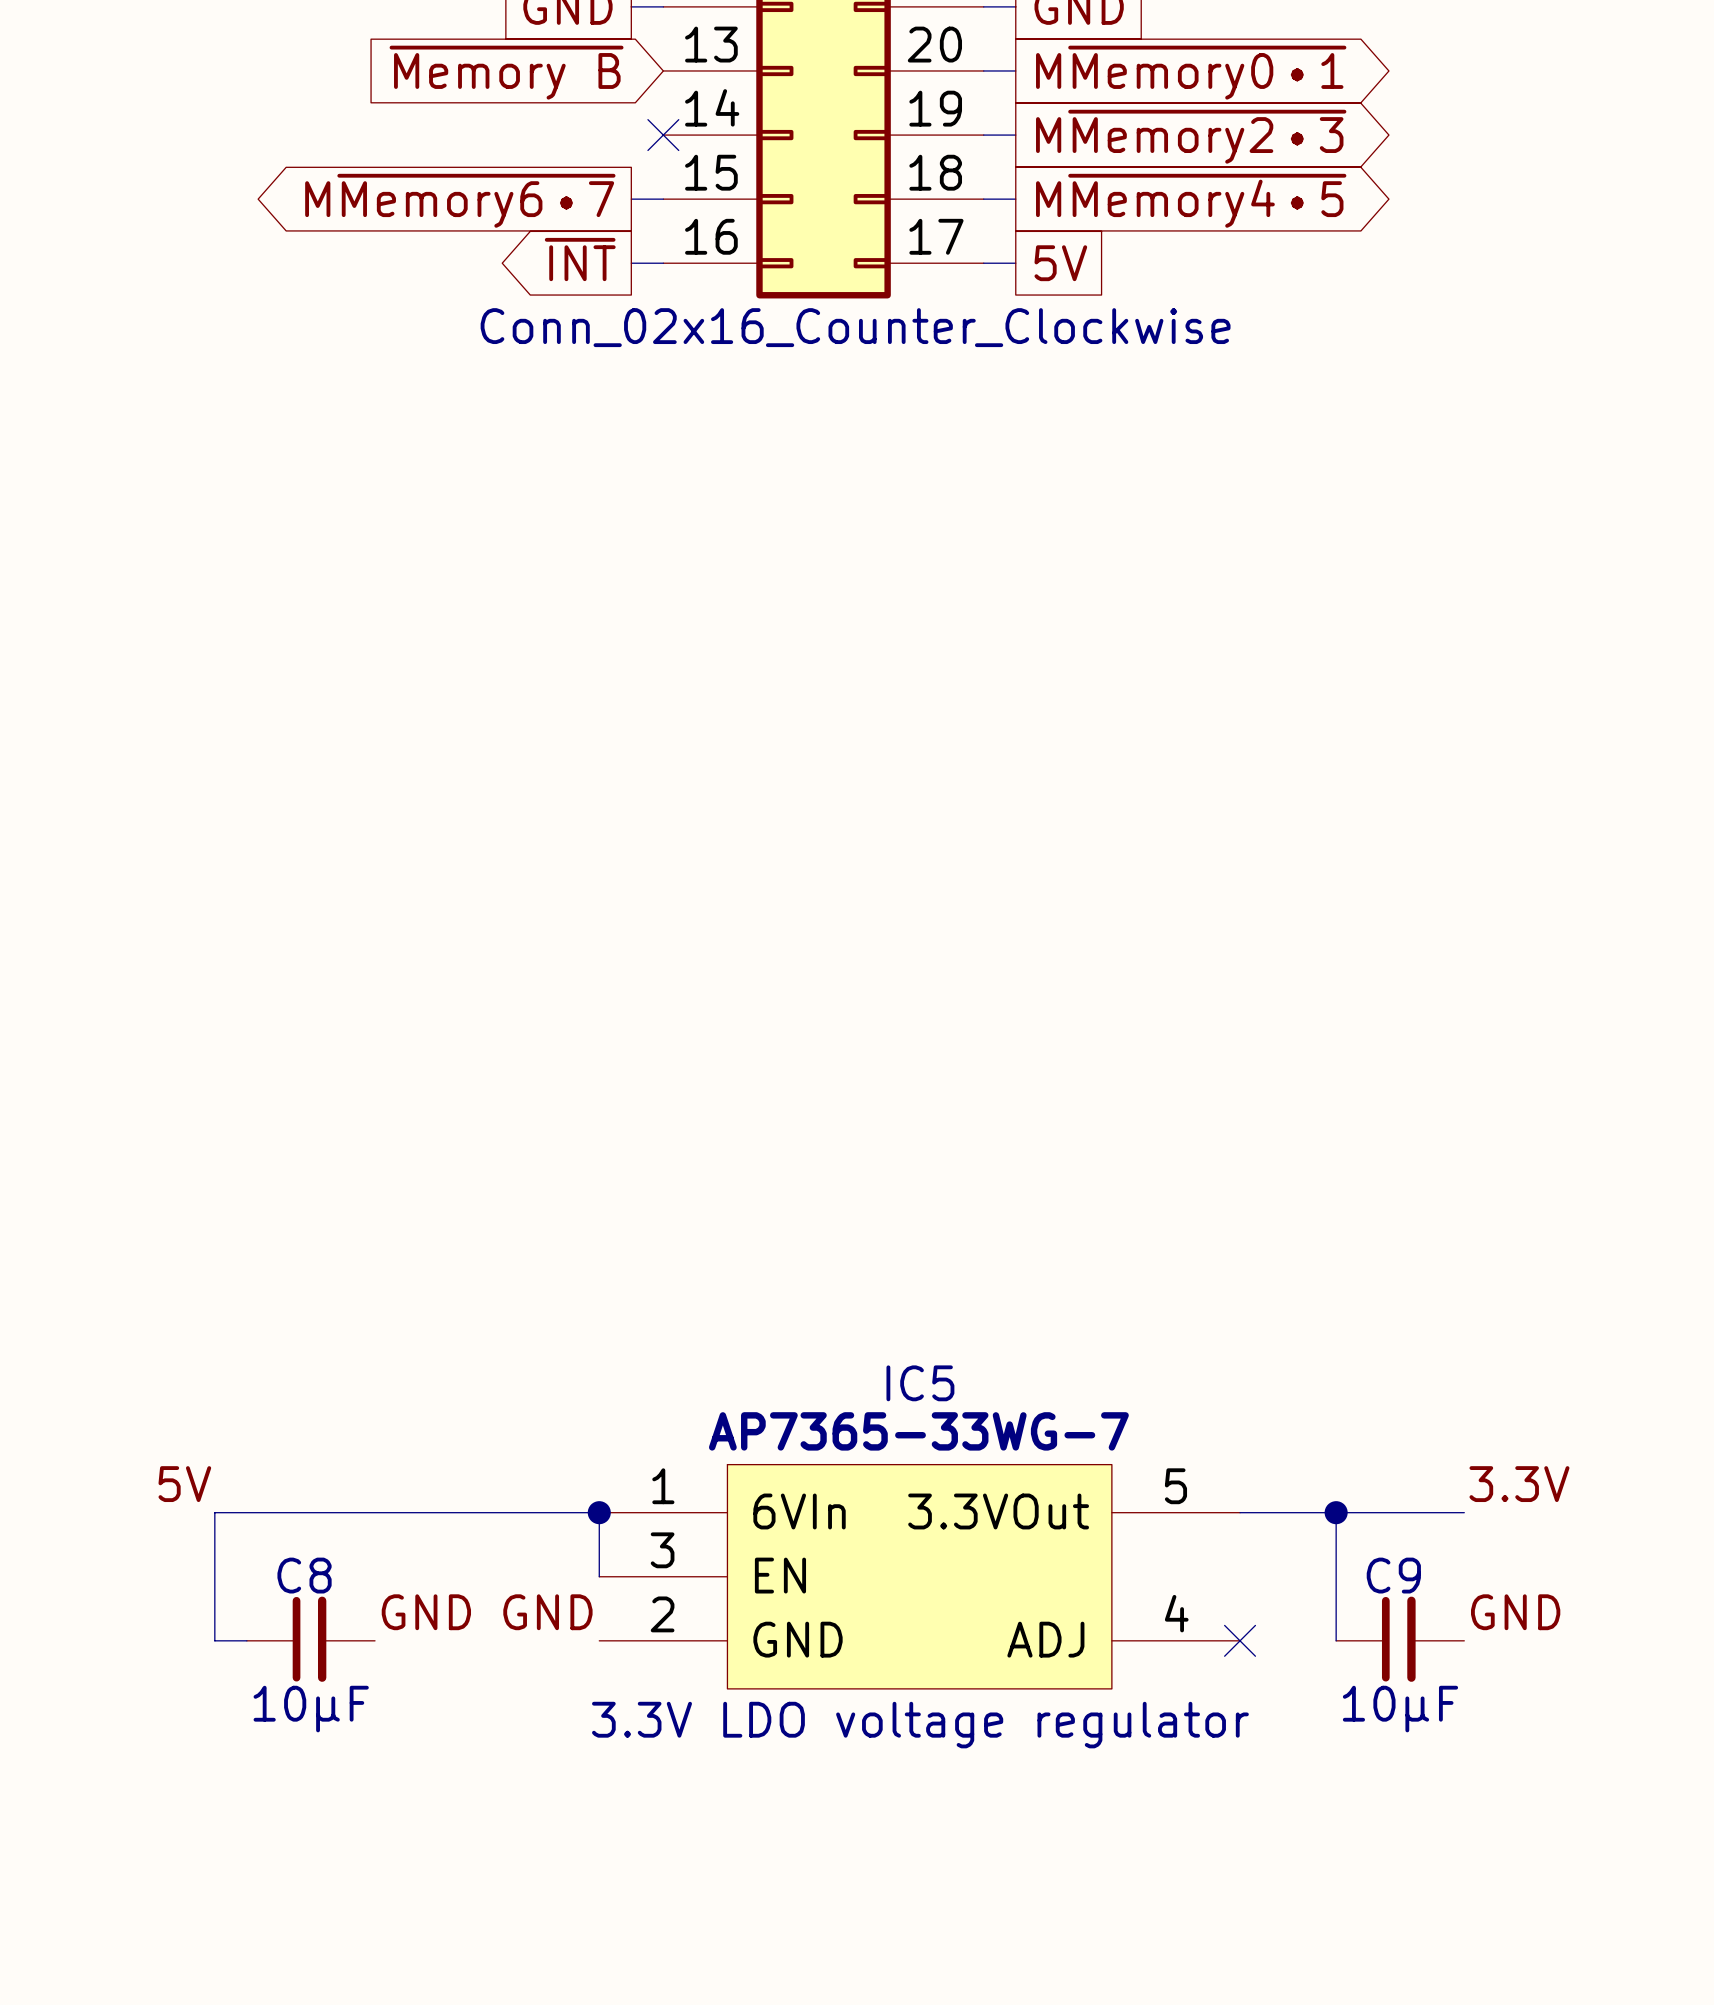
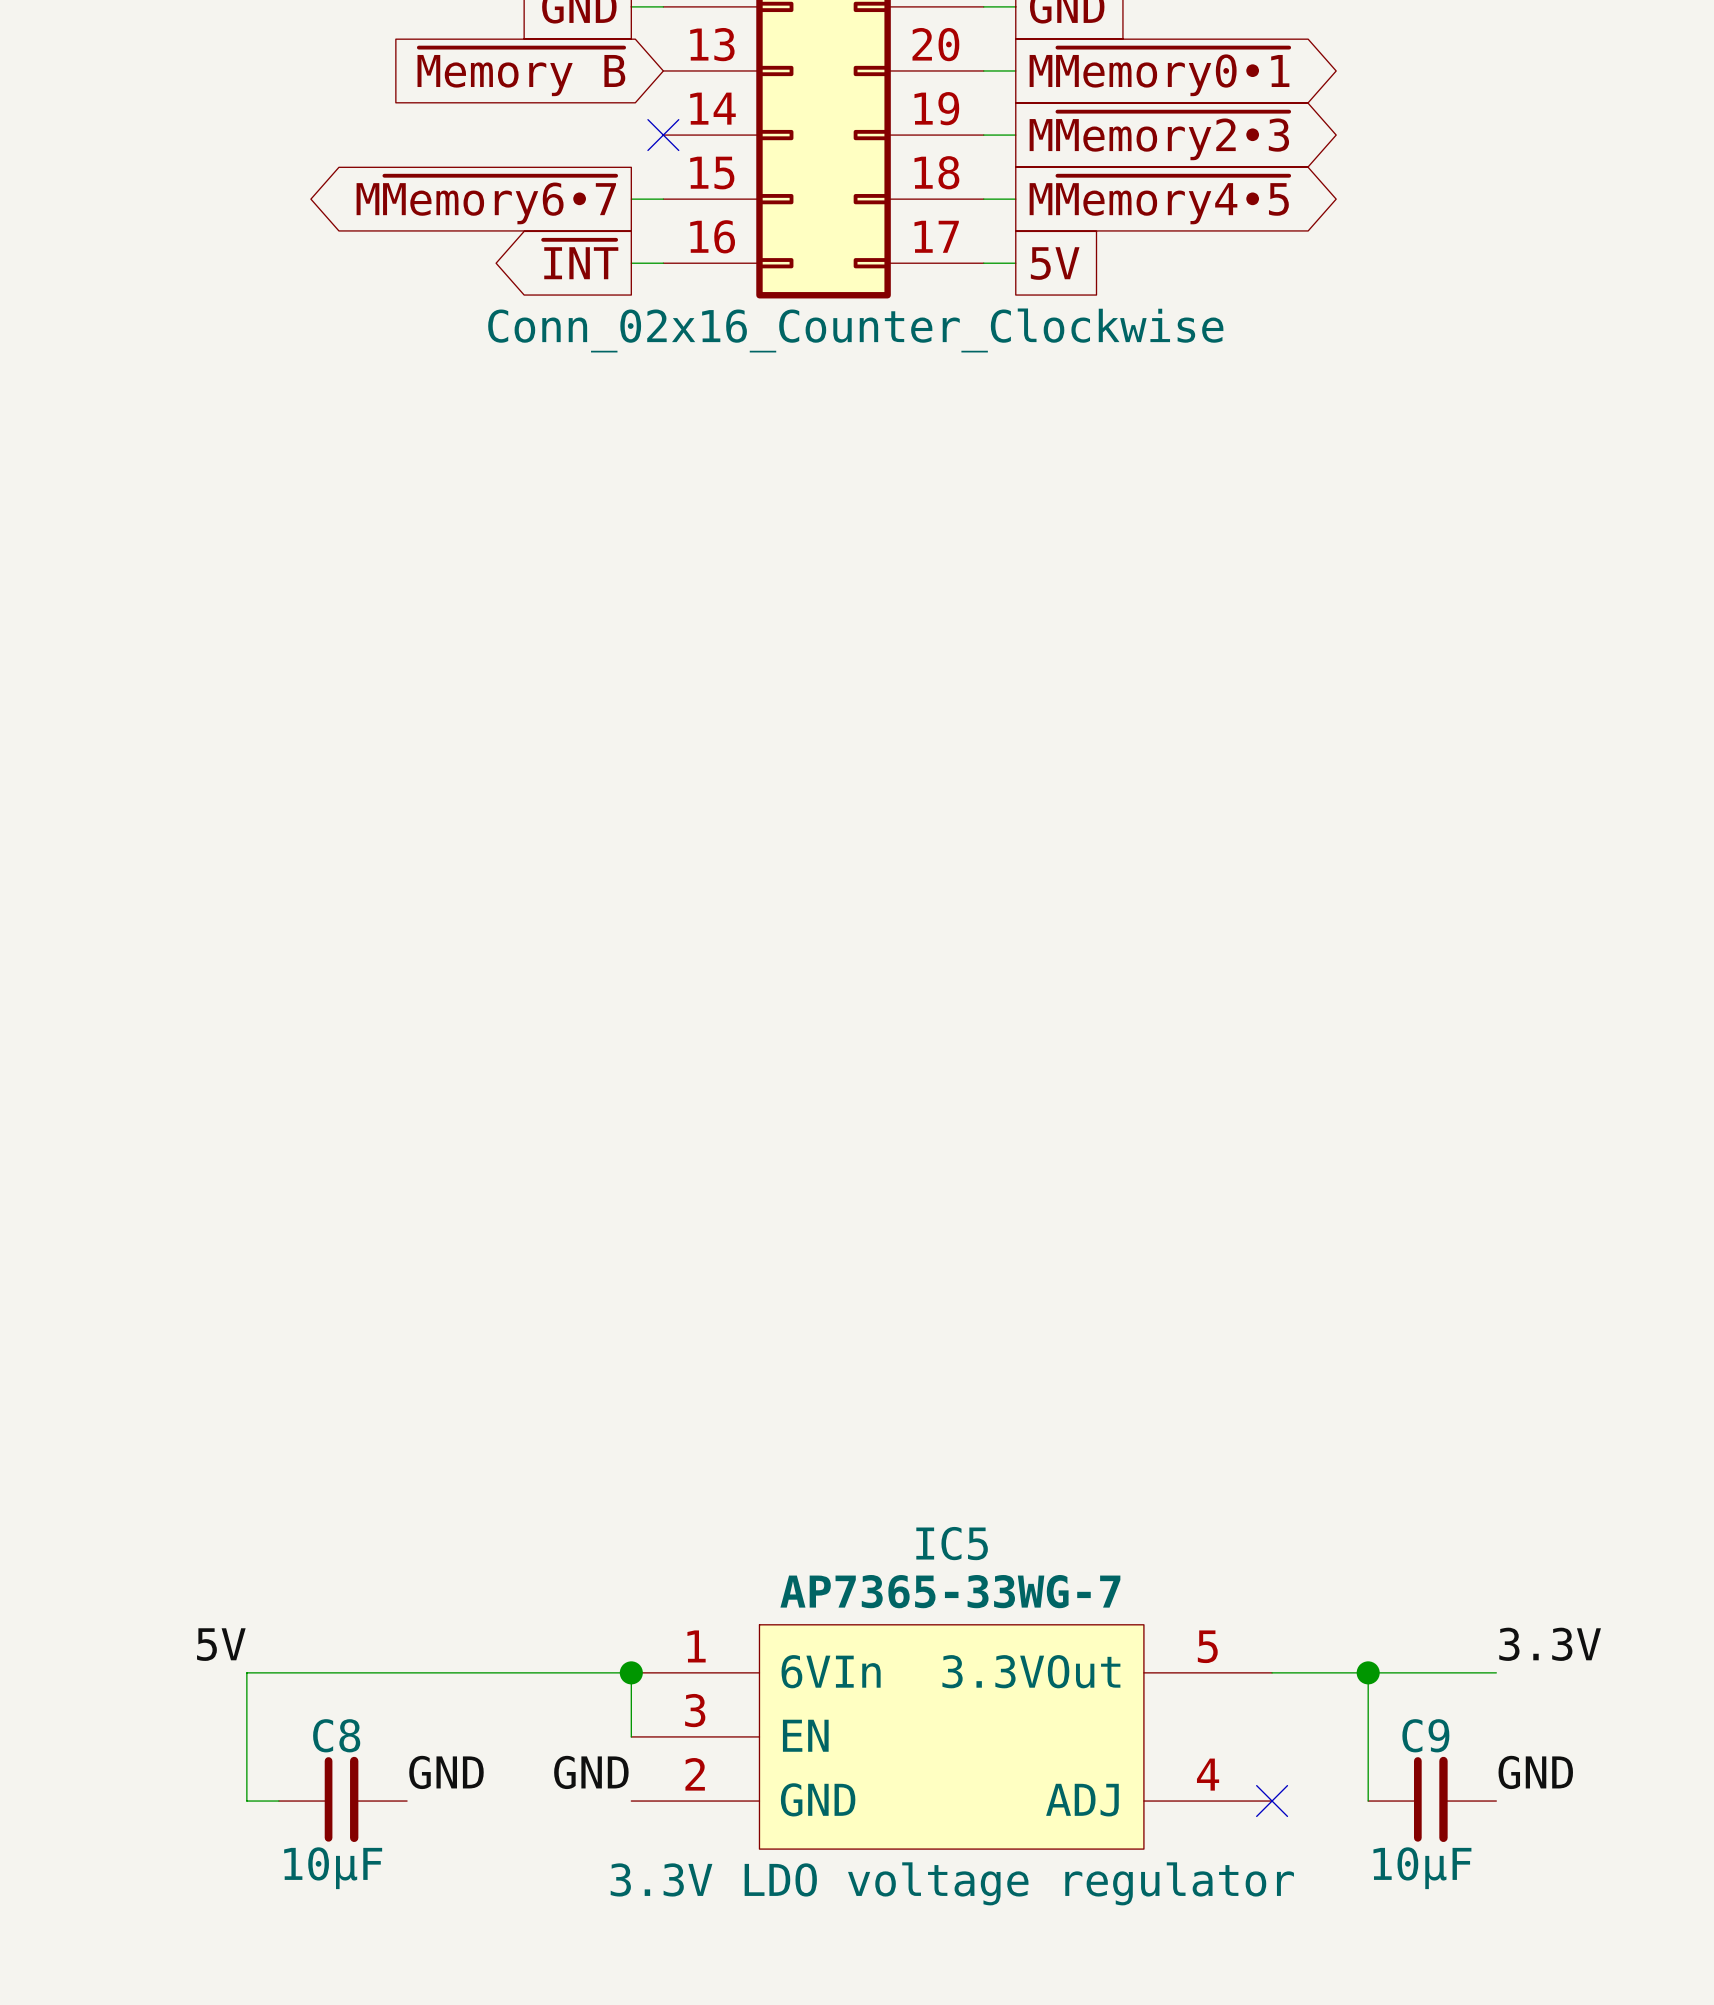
label position: 5V (184, 1484) -> 5V (221, 1644)
label position: 3.3V (1519, 1484) -> 3.3V (1550, 1644)
junction: (599, 1512) -> none
wire: (1240, 1512) (1464, 1512) -> (1272, 1672) (1496, 1672)
wire: (1336, 1512) (1336, 1640) -> (1368, 1672) (1368, 1801)
junction: (1336, 1512) -> none
wire: (599, 1576) (599, 1512) (214, 1512) (214, 1640) (246, 1640) -> (631, 1736) (631, 1672) (246, 1672) (246, 1801) (278, 1801)
IC5 position: (919, 1576) -> (951, 1736)
label: GND (426, 1612) -> none
label: GND (547, 1612) -> none
label position: GND (1515, 1612) -> GND (1535, 1772)
C8 position: (310, 1639) -> (342, 1799)
C9 position: (1400, 1639) -> (1432, 1799)
no-connect mark: (1240, 1640) -> none
junction: none -> (631, 1672)
junction: none -> (1368, 1672)
label: none -> GND (446, 1772)
label: none -> GND (591, 1772)
no-connect mark: none -> (1272, 1801)

